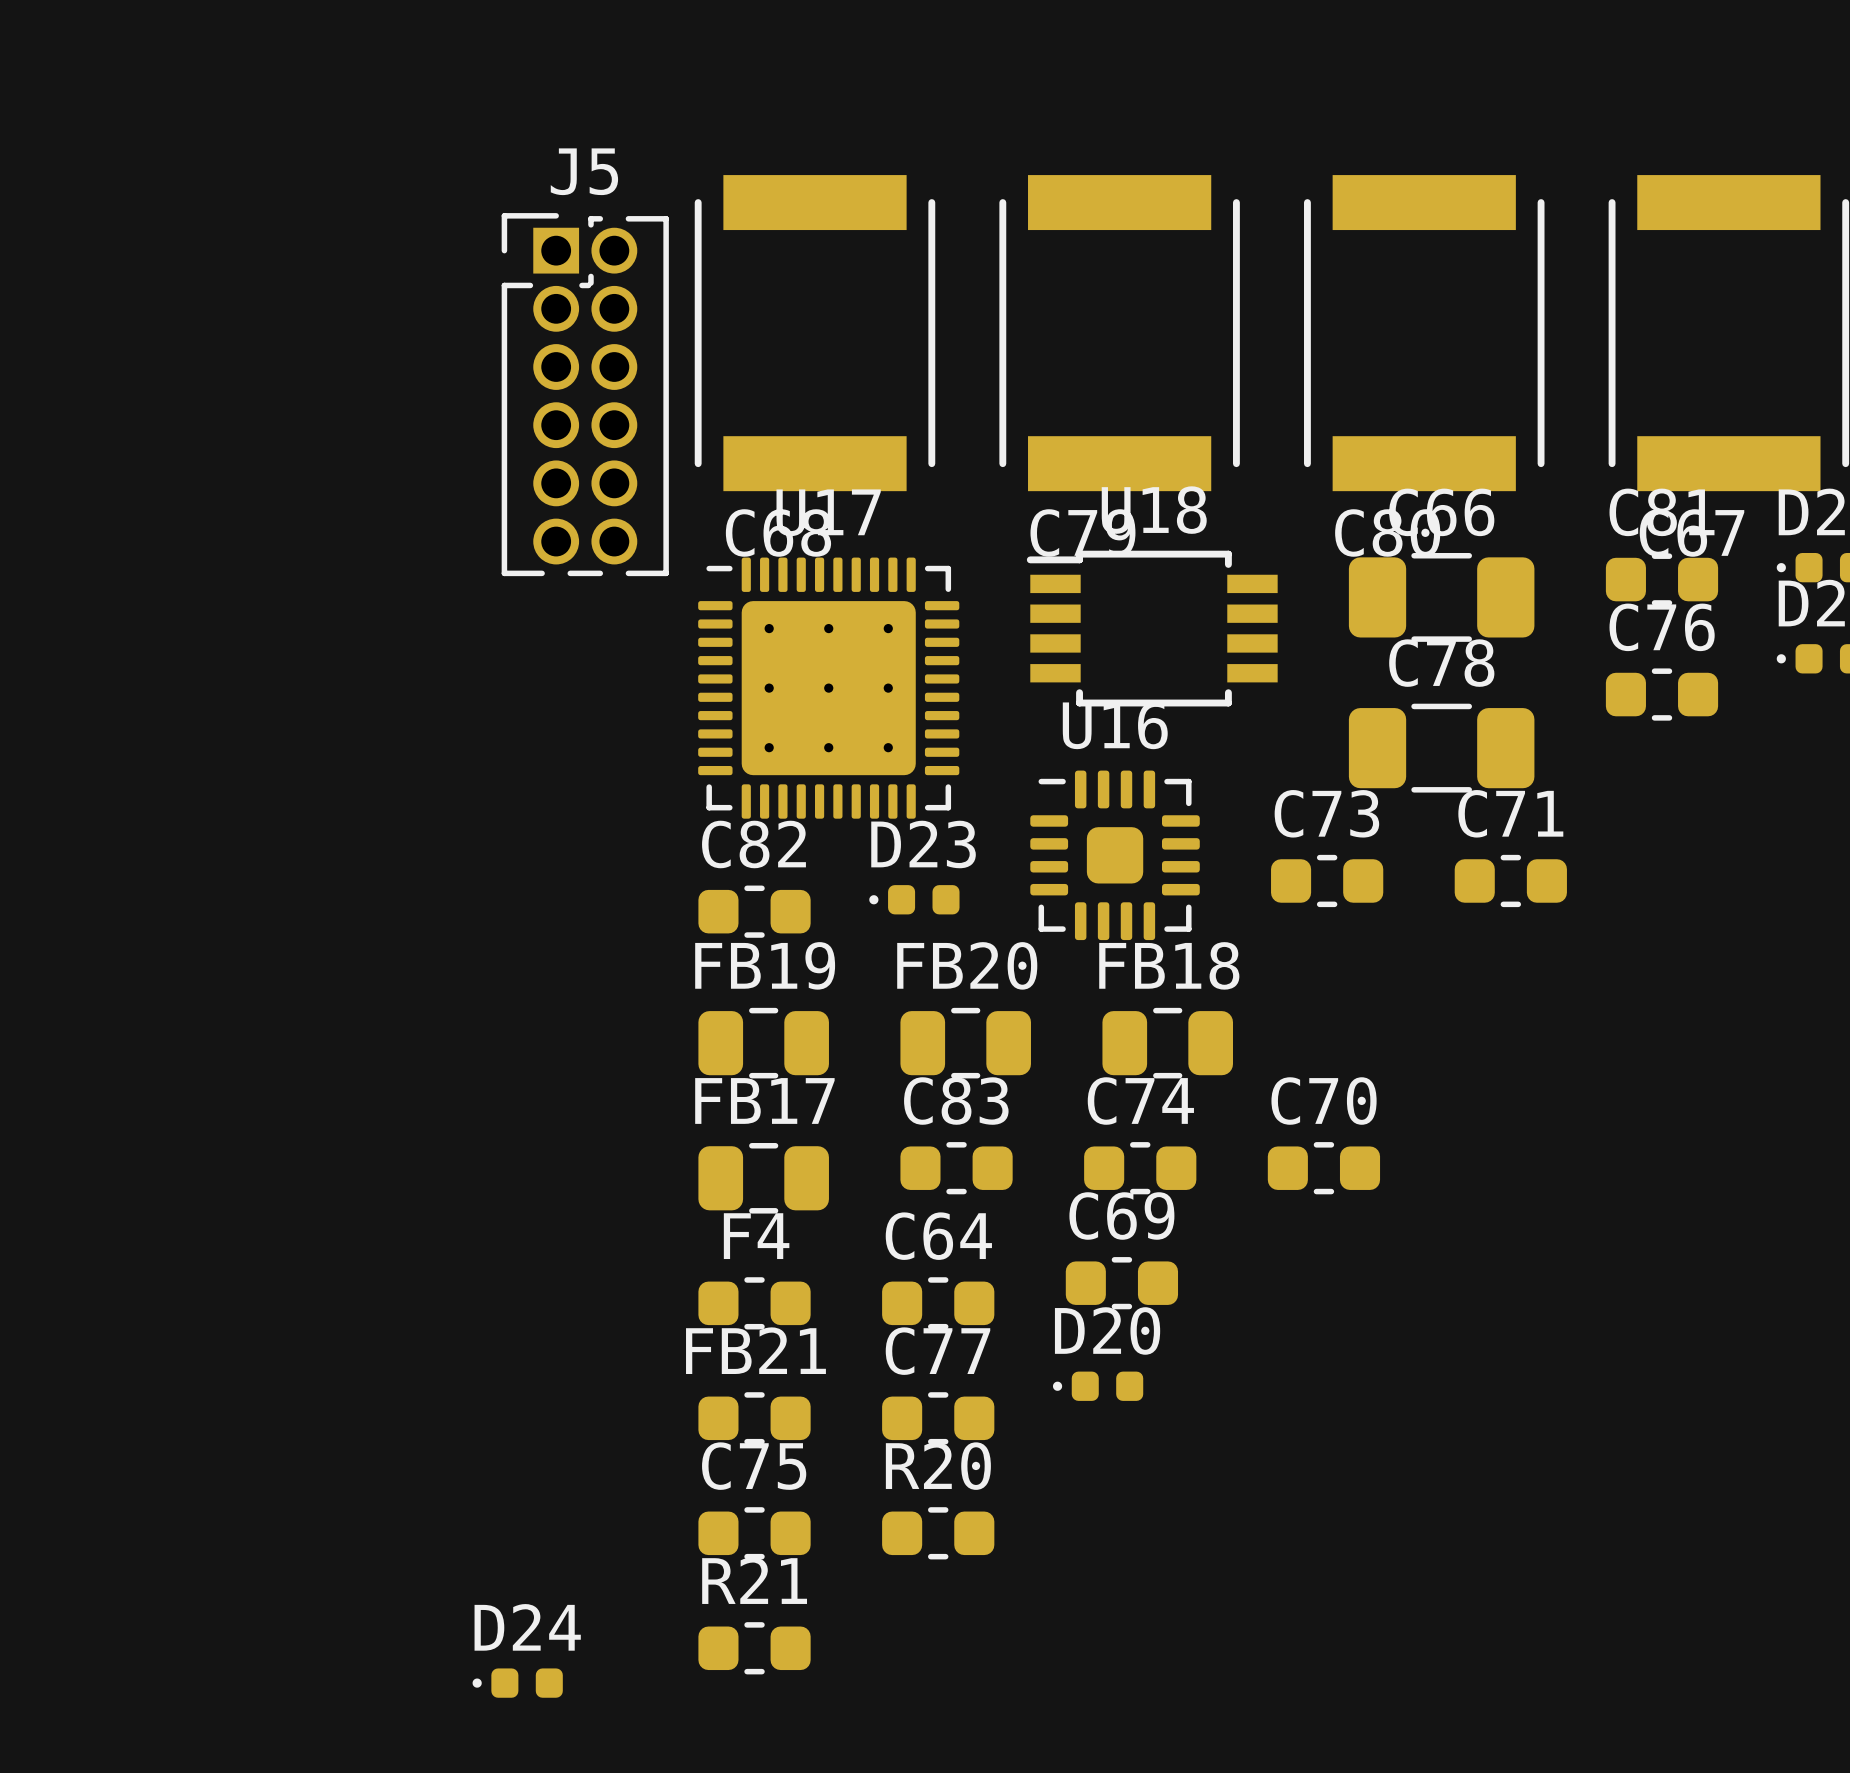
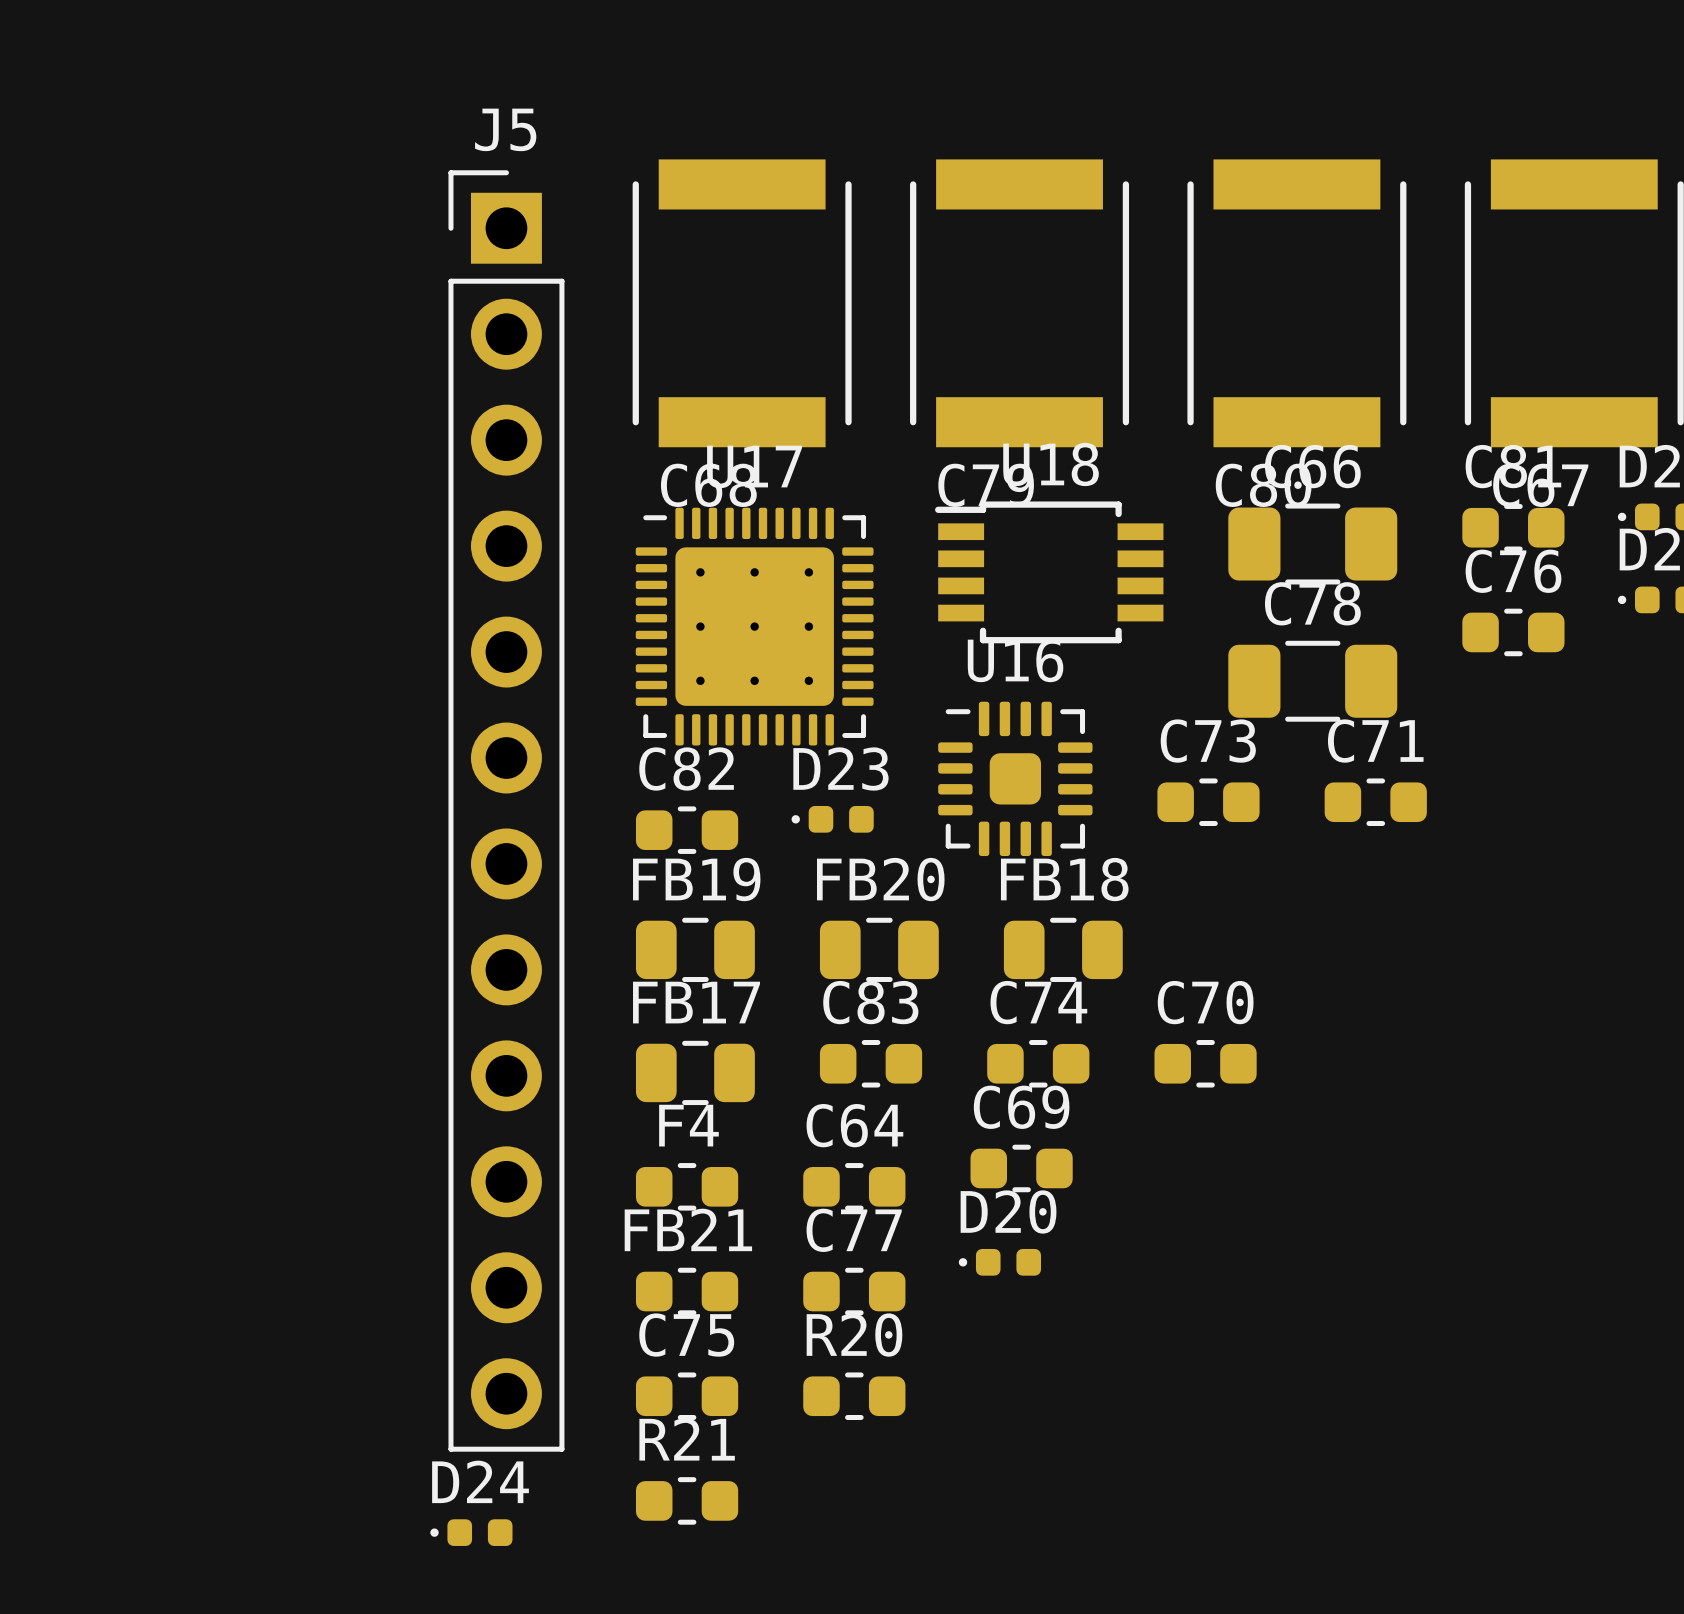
J5 name position: J5 (584, 171) -> J5 (505, 129)
J5 footprint: [501, 213, 669, 577] -> [448, 170, 565, 1452]

